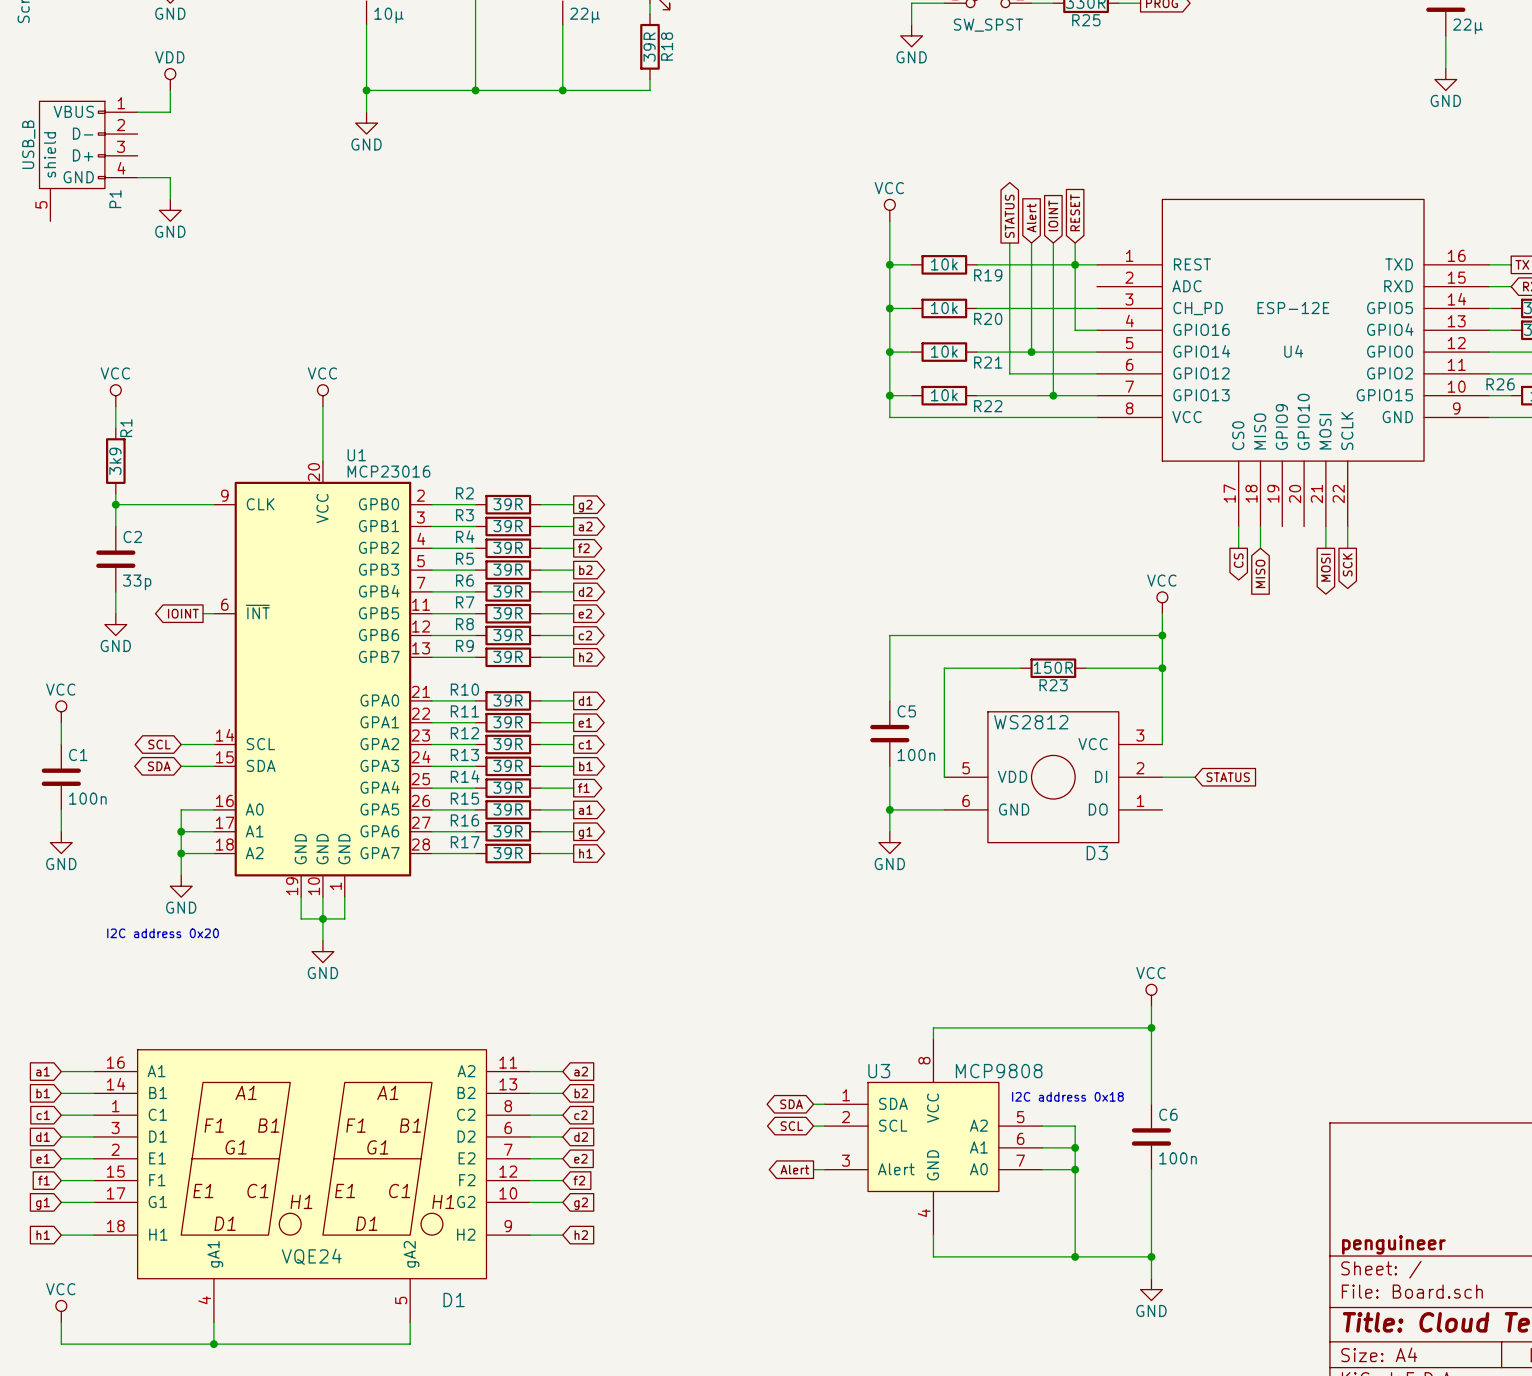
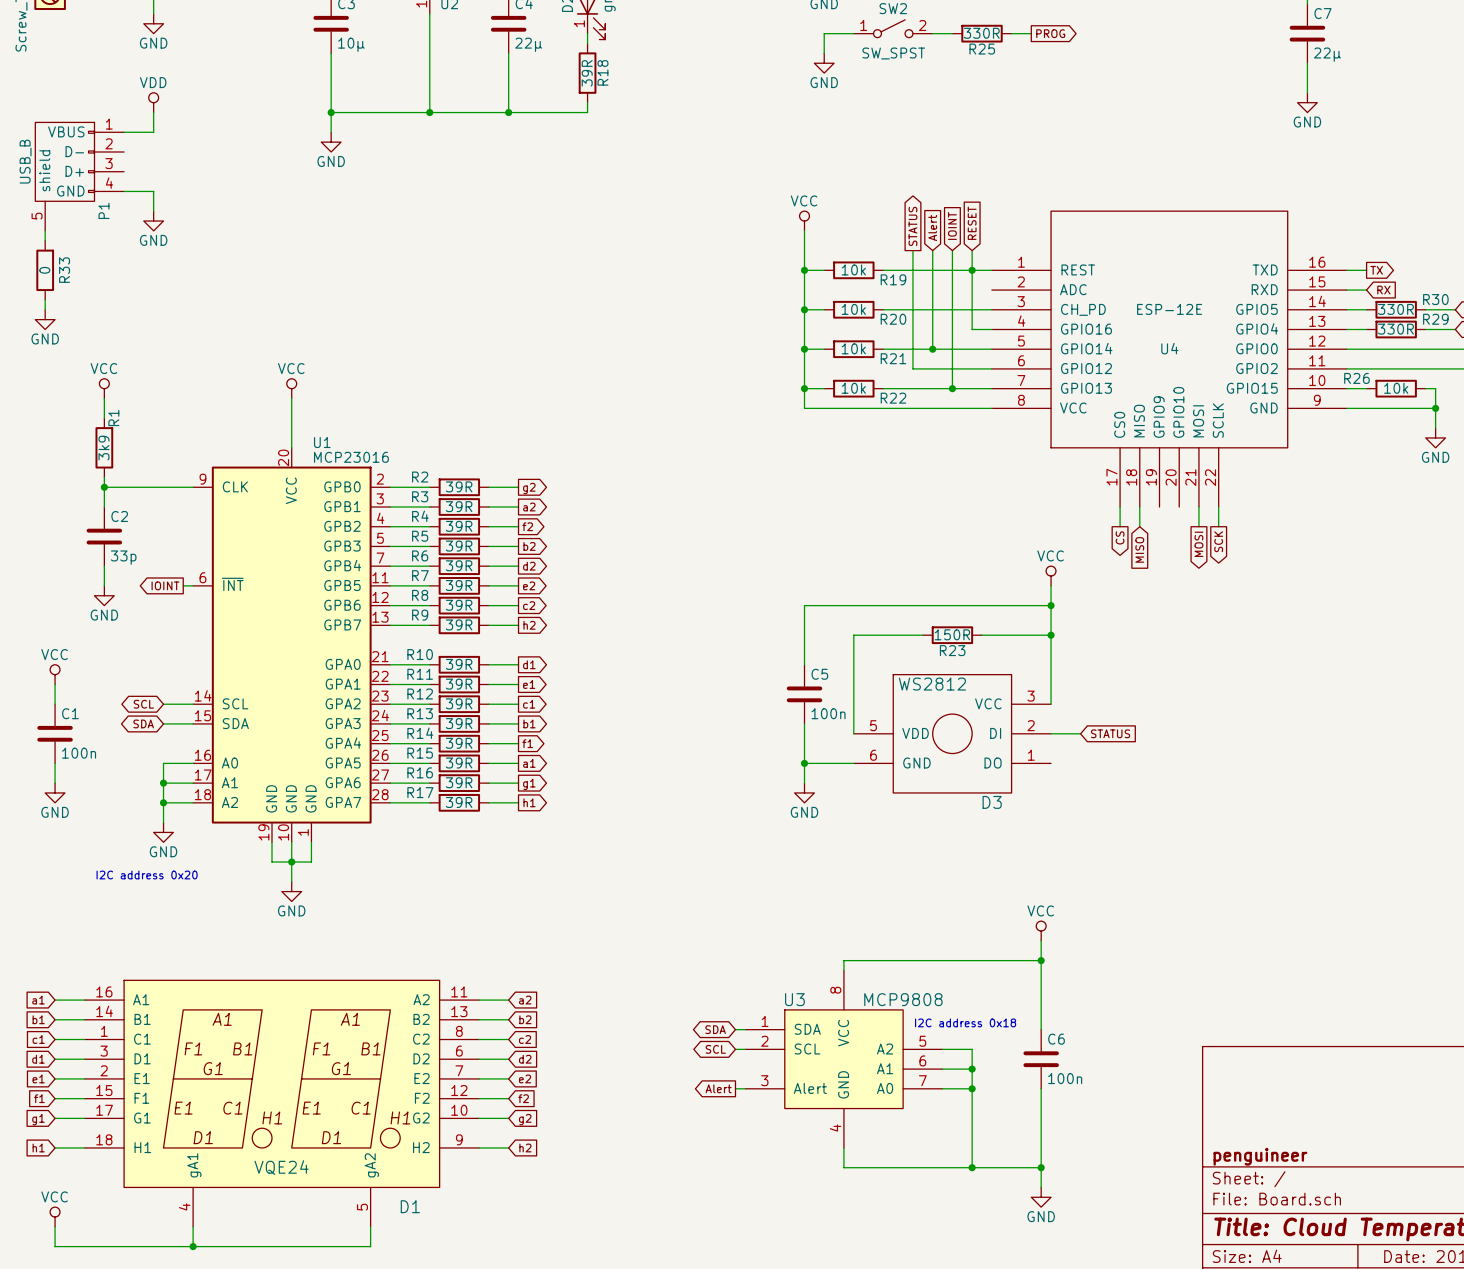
wire: none -> (45, 230) (45, 240)
R33: none -> 0 (45, 270)
wire: none -> (45, 299) (45, 309)
power symbol: none -> GND (45, 319)

